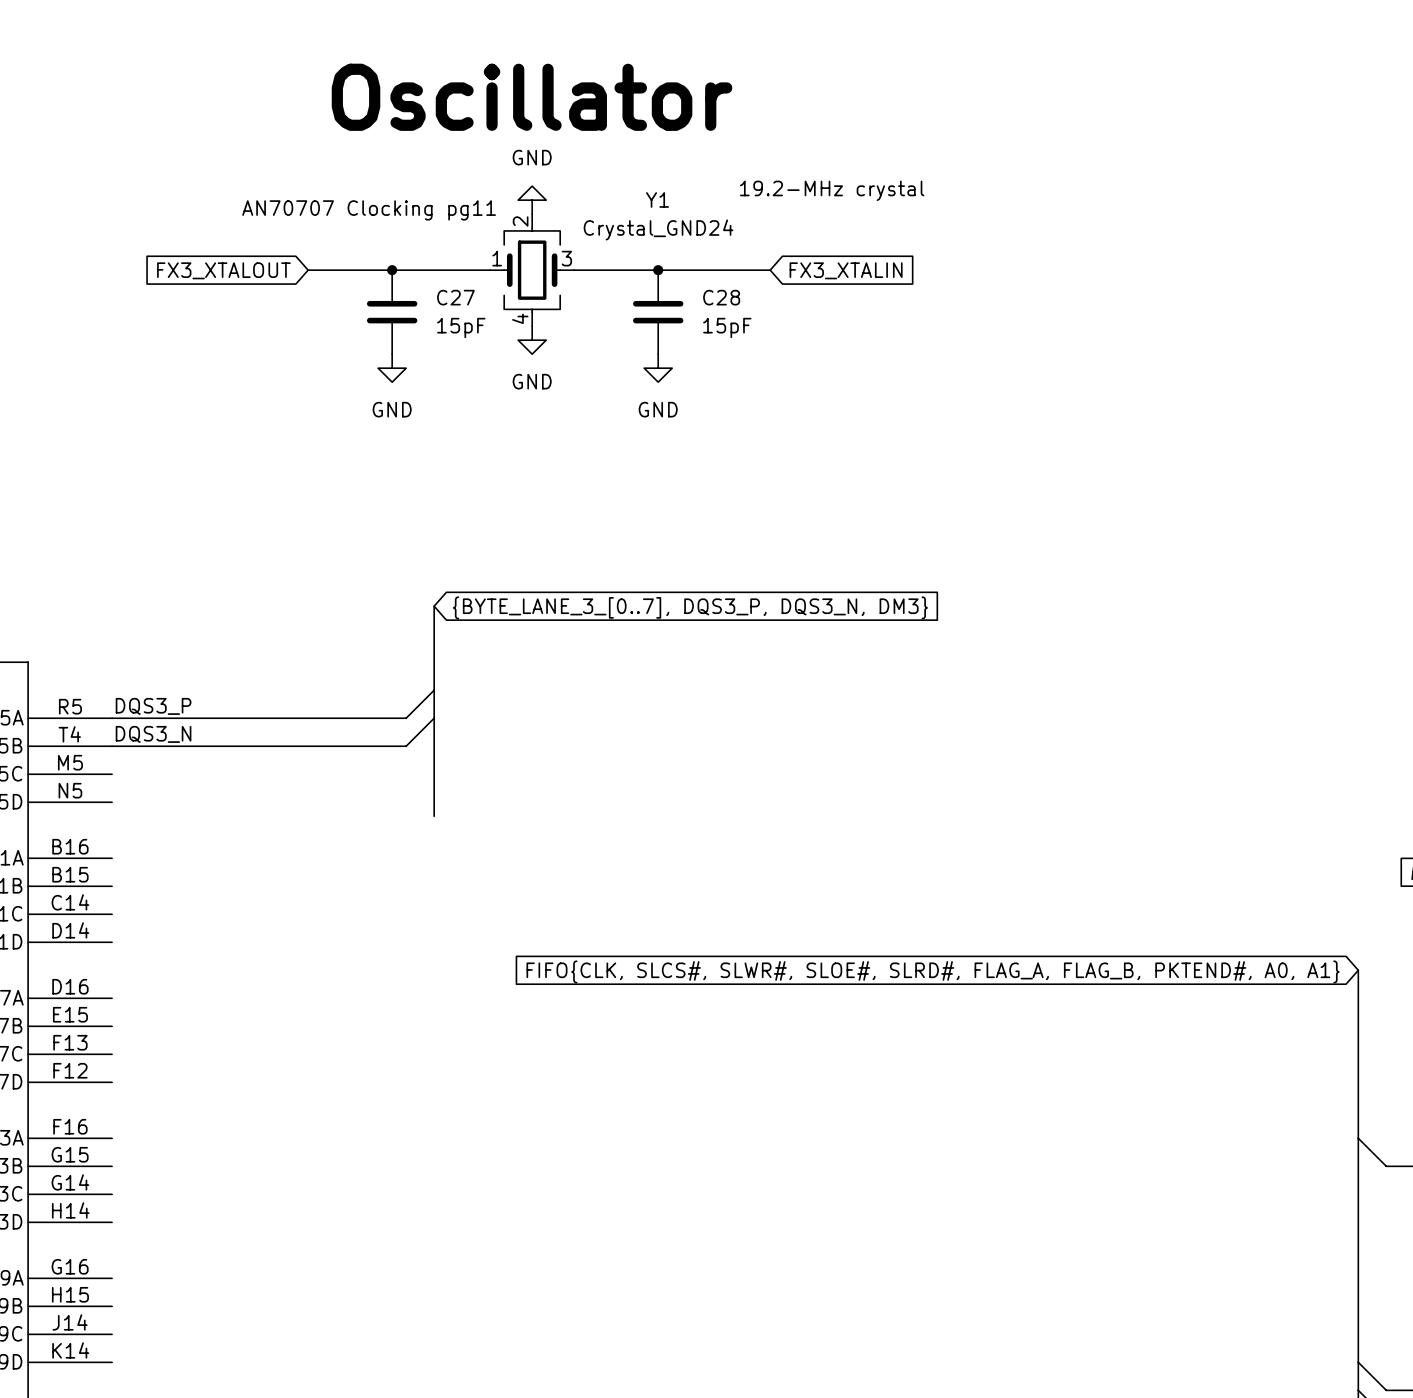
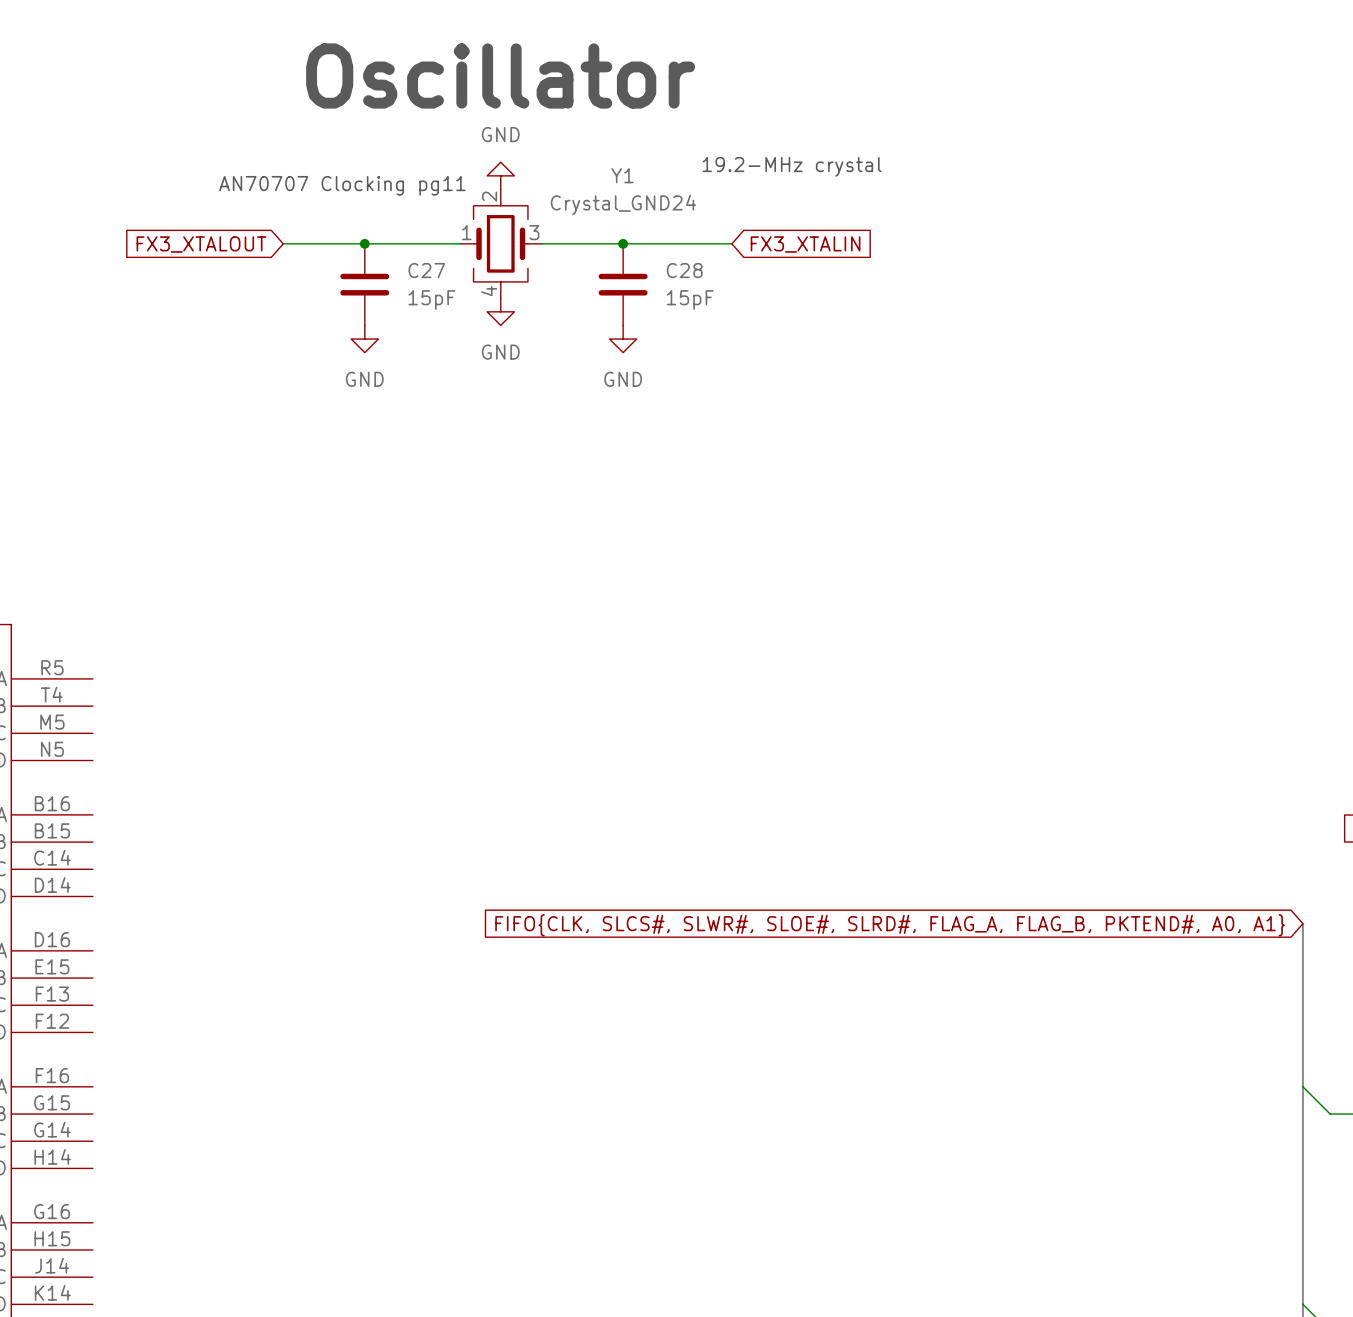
bus: (434, 606) (434, 816) -> none
global label: {BYTE_LANE_3_[0..7], DQS3_P, DQS3_N, DM3} (690, 607) -> none
wire: (434, 690) (406, 718) (112, 718) -> none
label: DQS3_P (153, 706) -> none
wire: (434, 718) (406, 746) (112, 746) -> none
label: DQS3_N (153, 734) -> none

